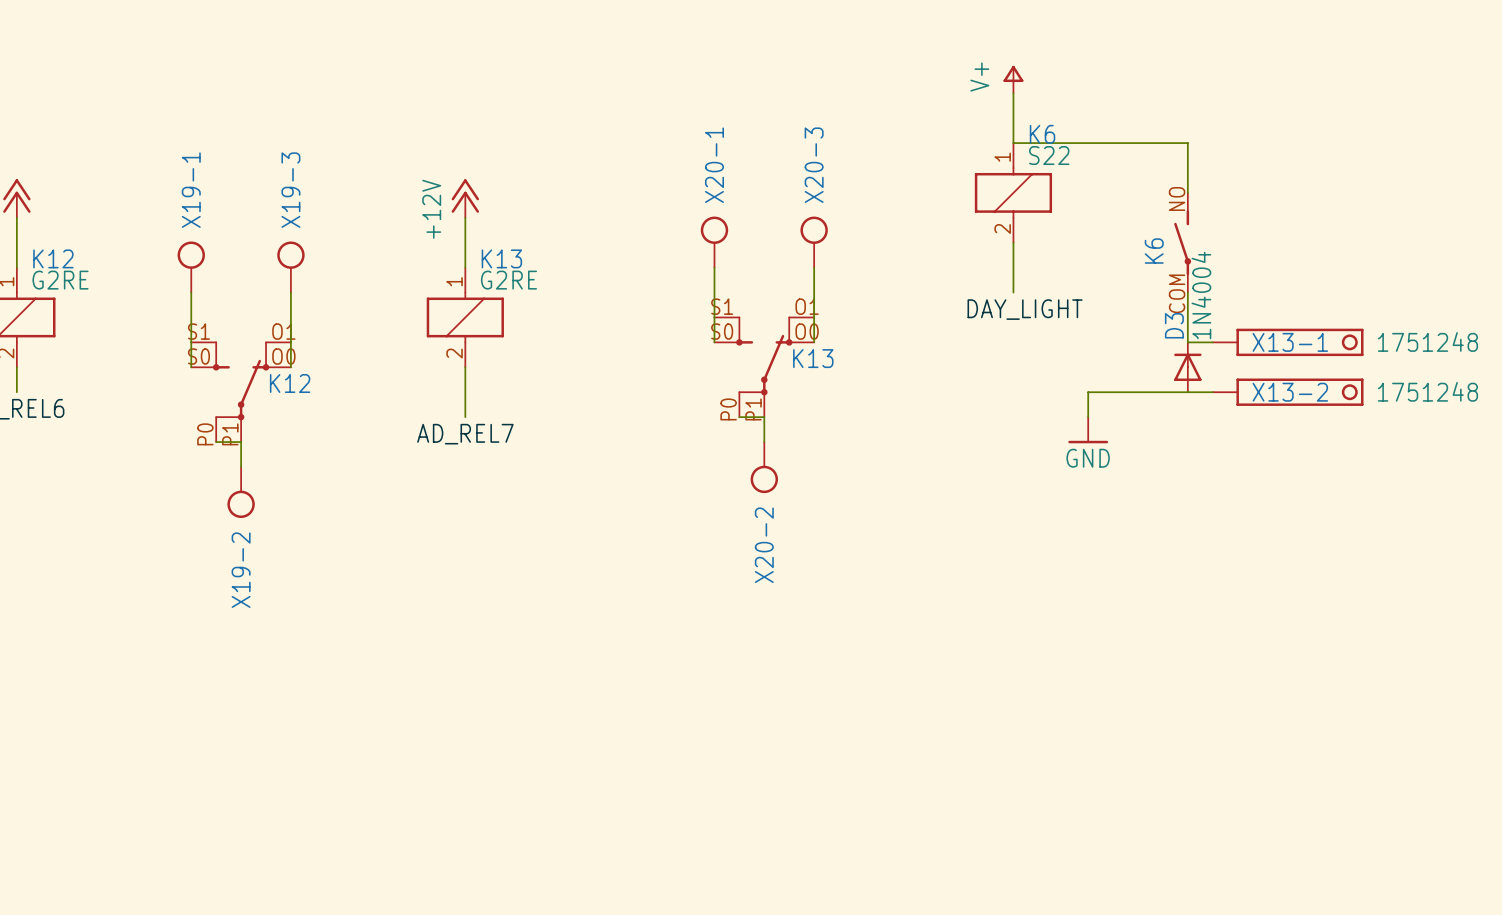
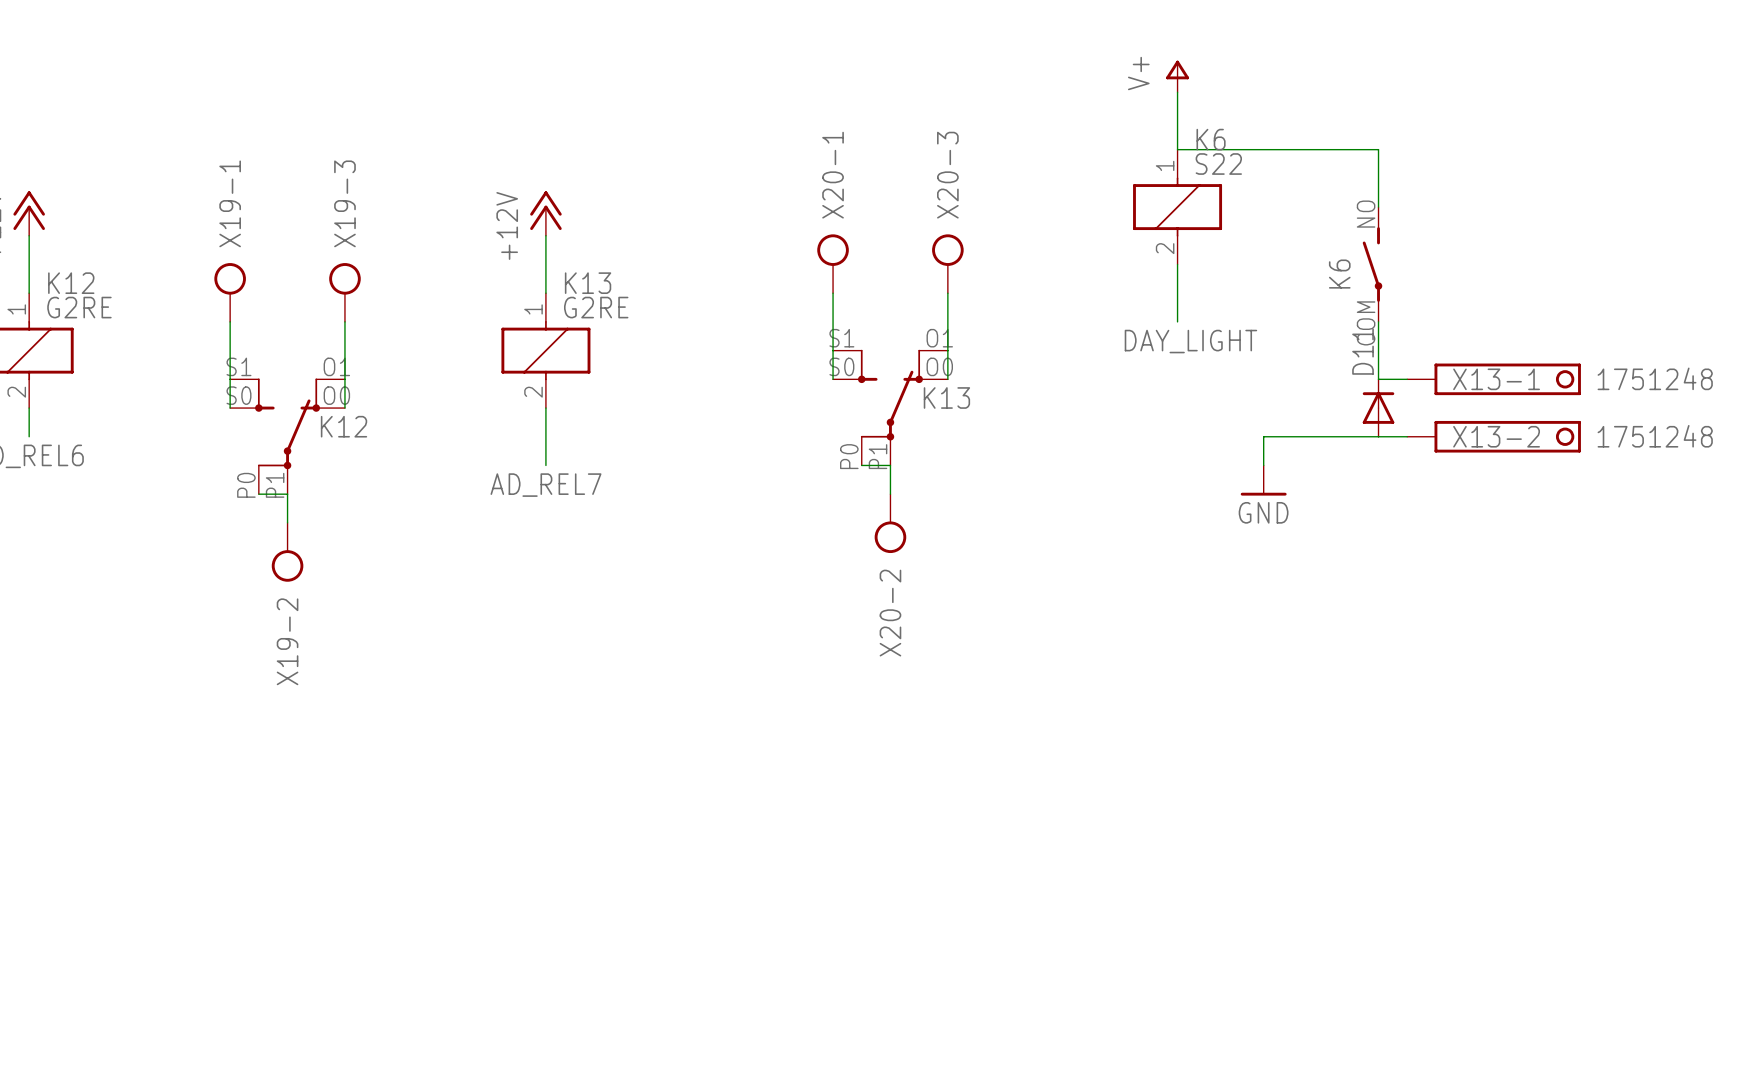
D3 value: 1N4004 (1201, 295) -> none
D3 name: D3 (1174, 325) -> D11 (1363, 351)

